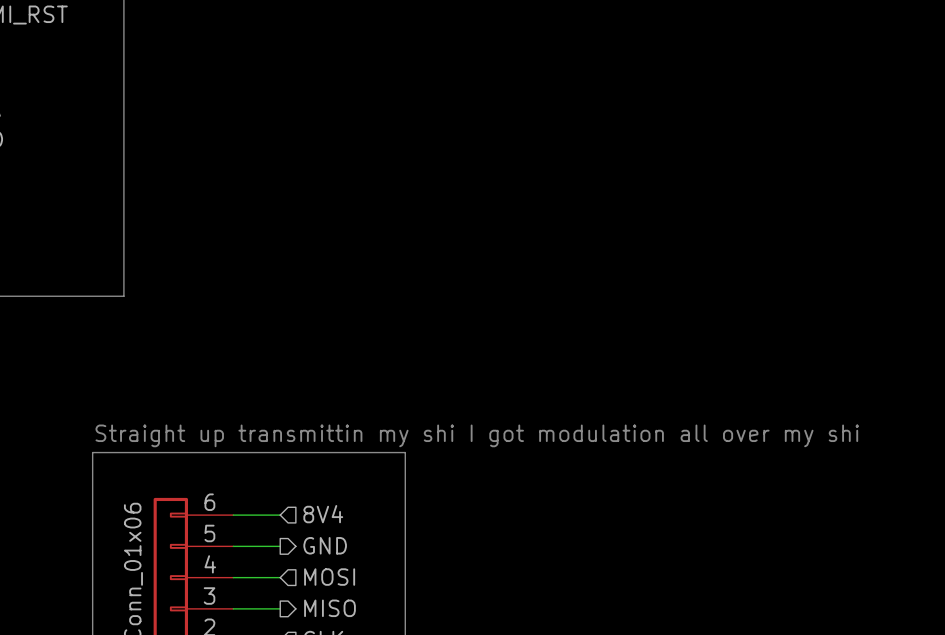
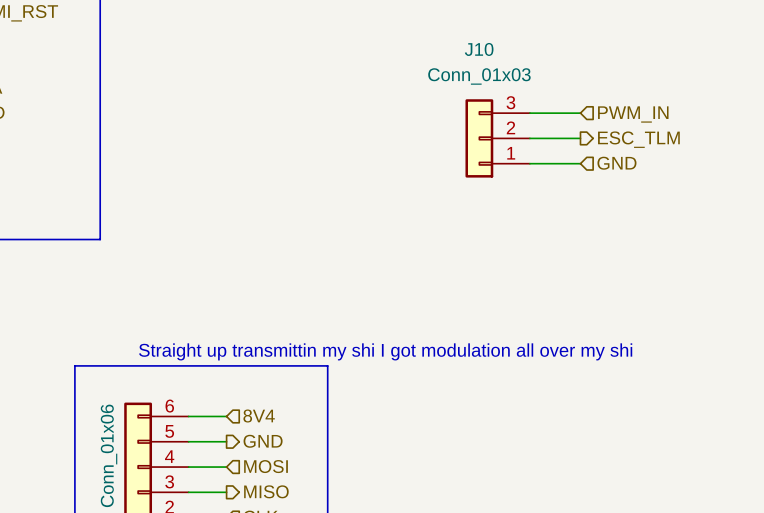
wire: none -> (529, 113) (580, 113)
hierarchical label: none -> PWM_IN (633, 114)
J10: none -> Conn_01x03 (497, 138)
wire: none -> (529, 138) (580, 138)
hierarchical label: none -> ESC_TLM (638, 139)
hierarchical label: none -> GND (616, 163)
wire: none -> (529, 163) (580, 163)

